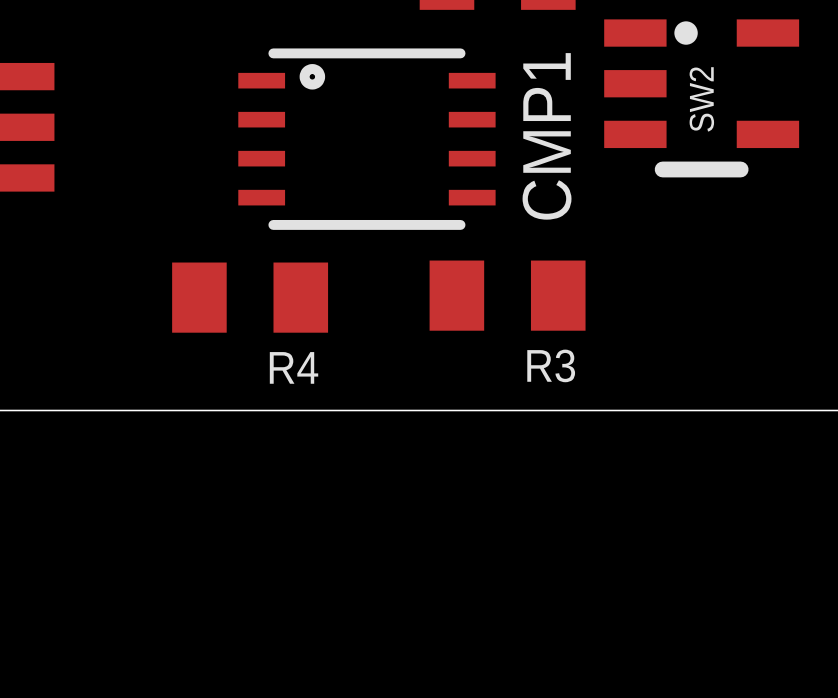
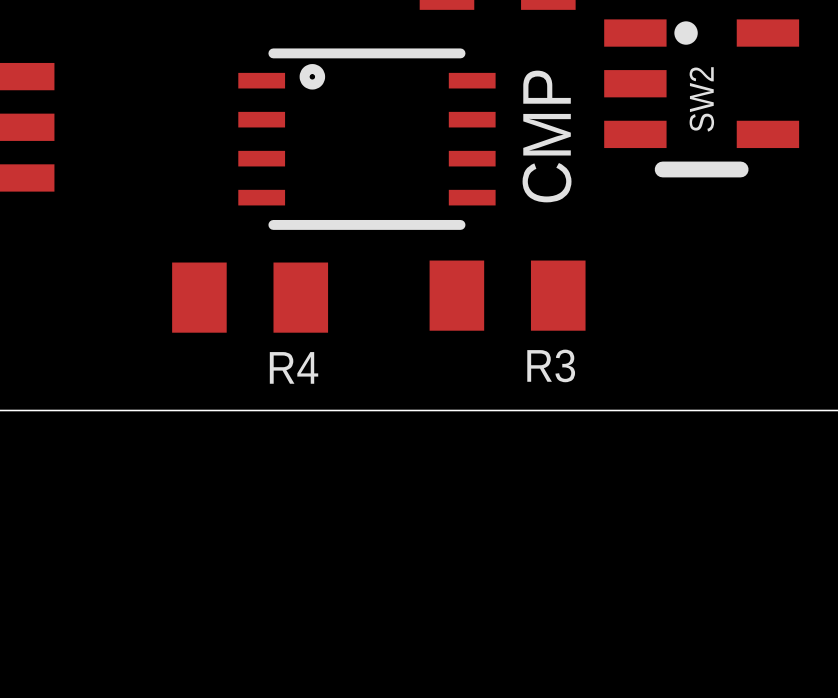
CMP1 name: CMP1 (547, 136) -> CMP (547, 136)

